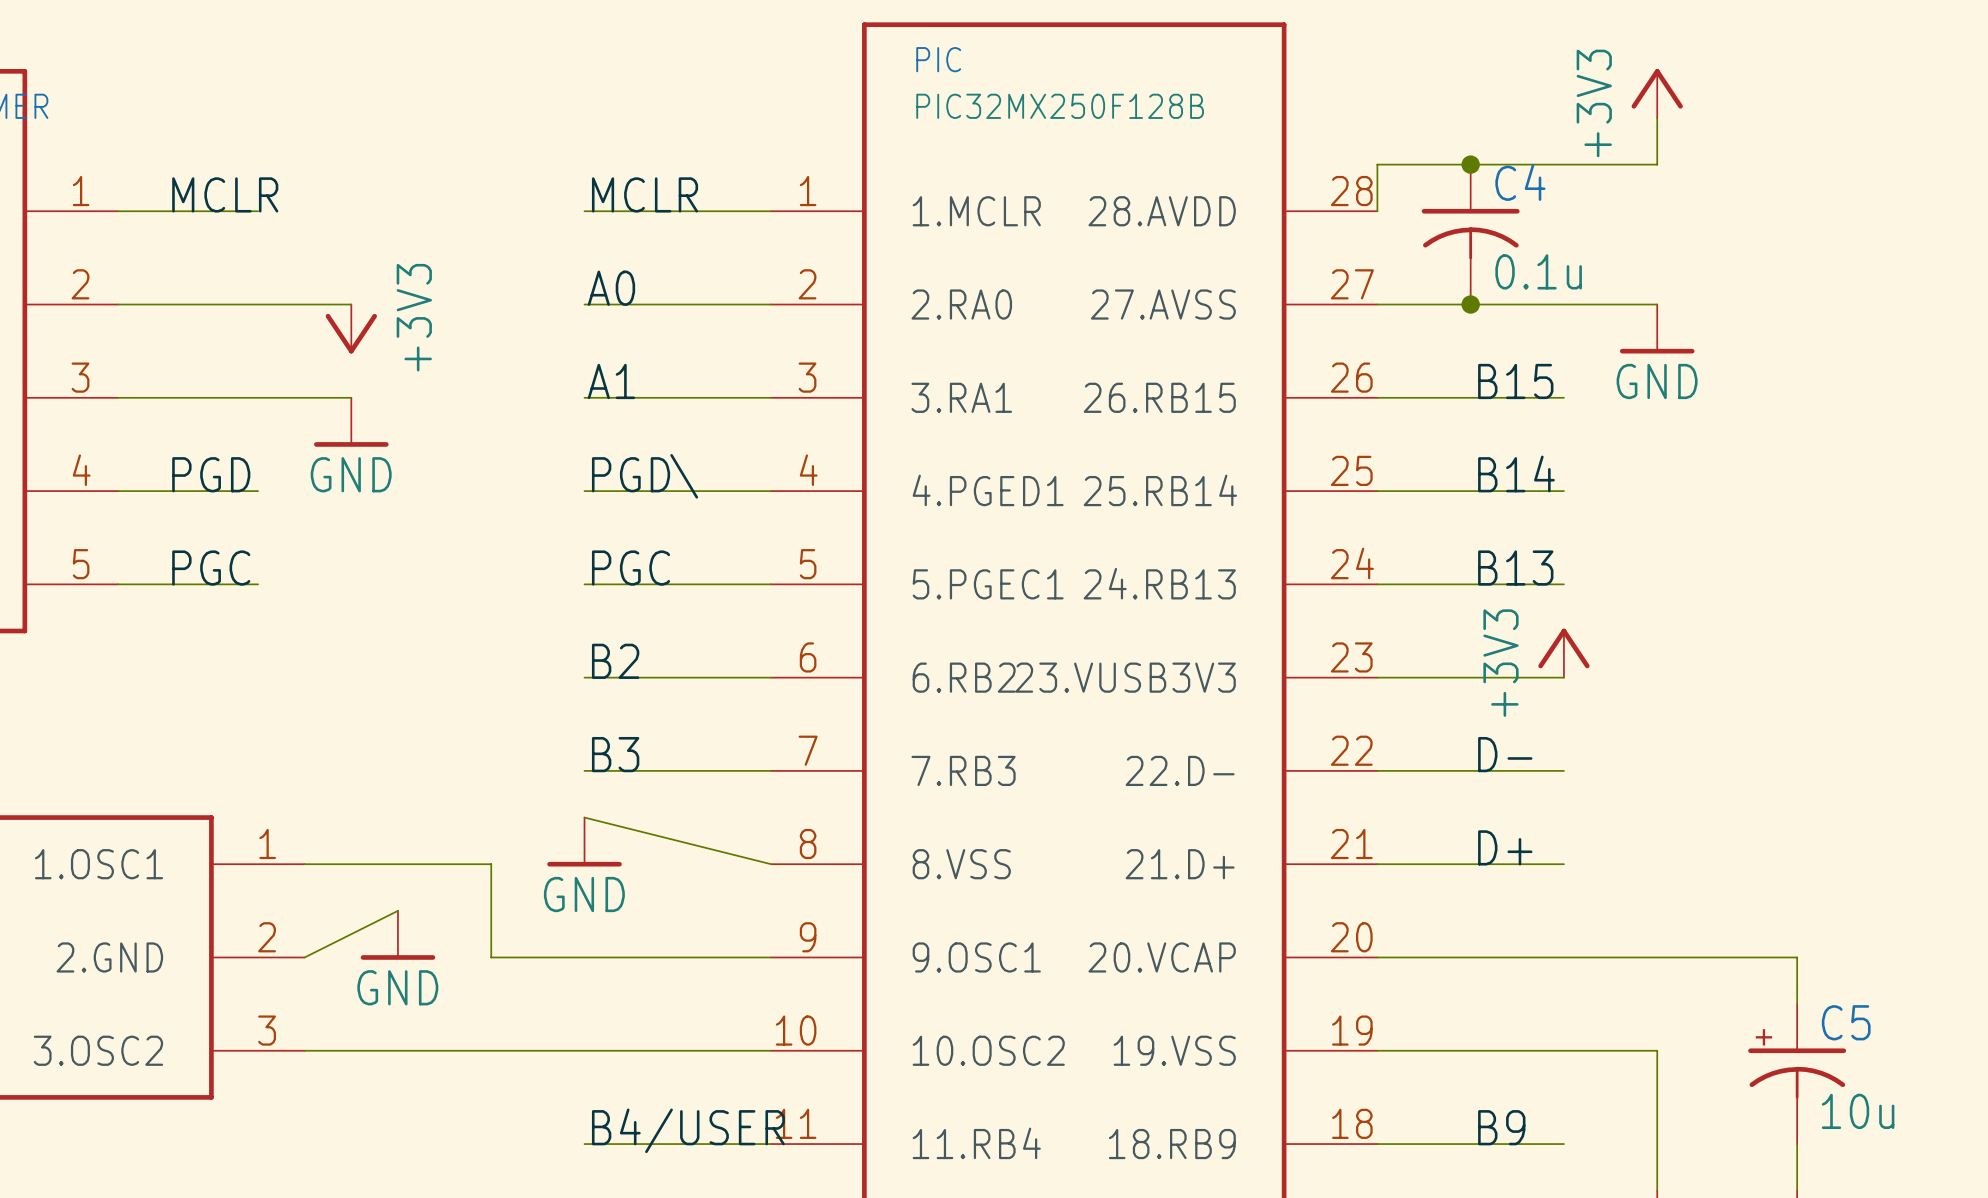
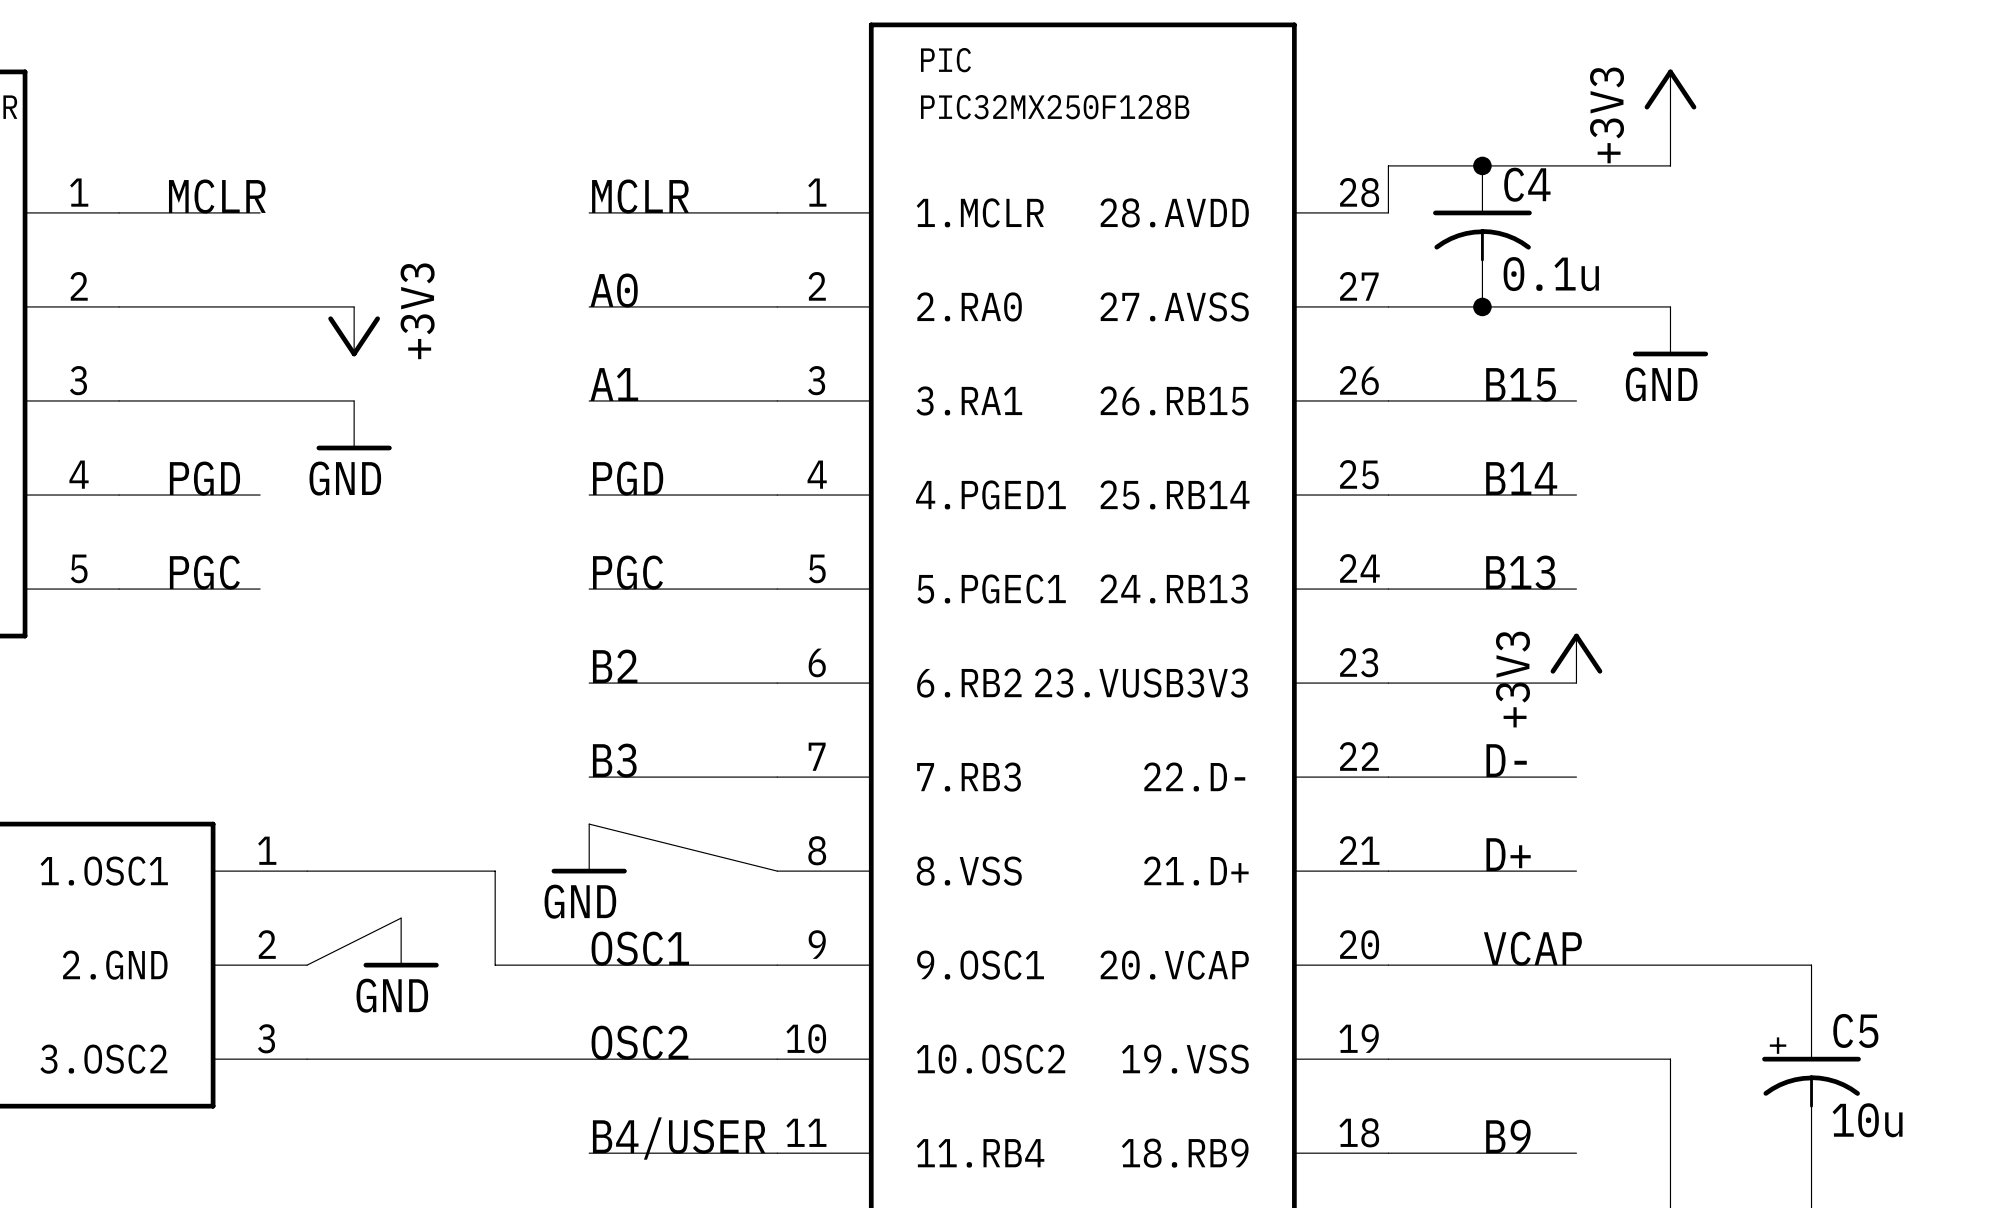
label: PGD\ (645, 476) -> PGD (628, 478)
label: none -> OSC1 (640, 948)
label: none -> VCAP (1532, 948)
label: none -> OSC2 (639, 1042)

